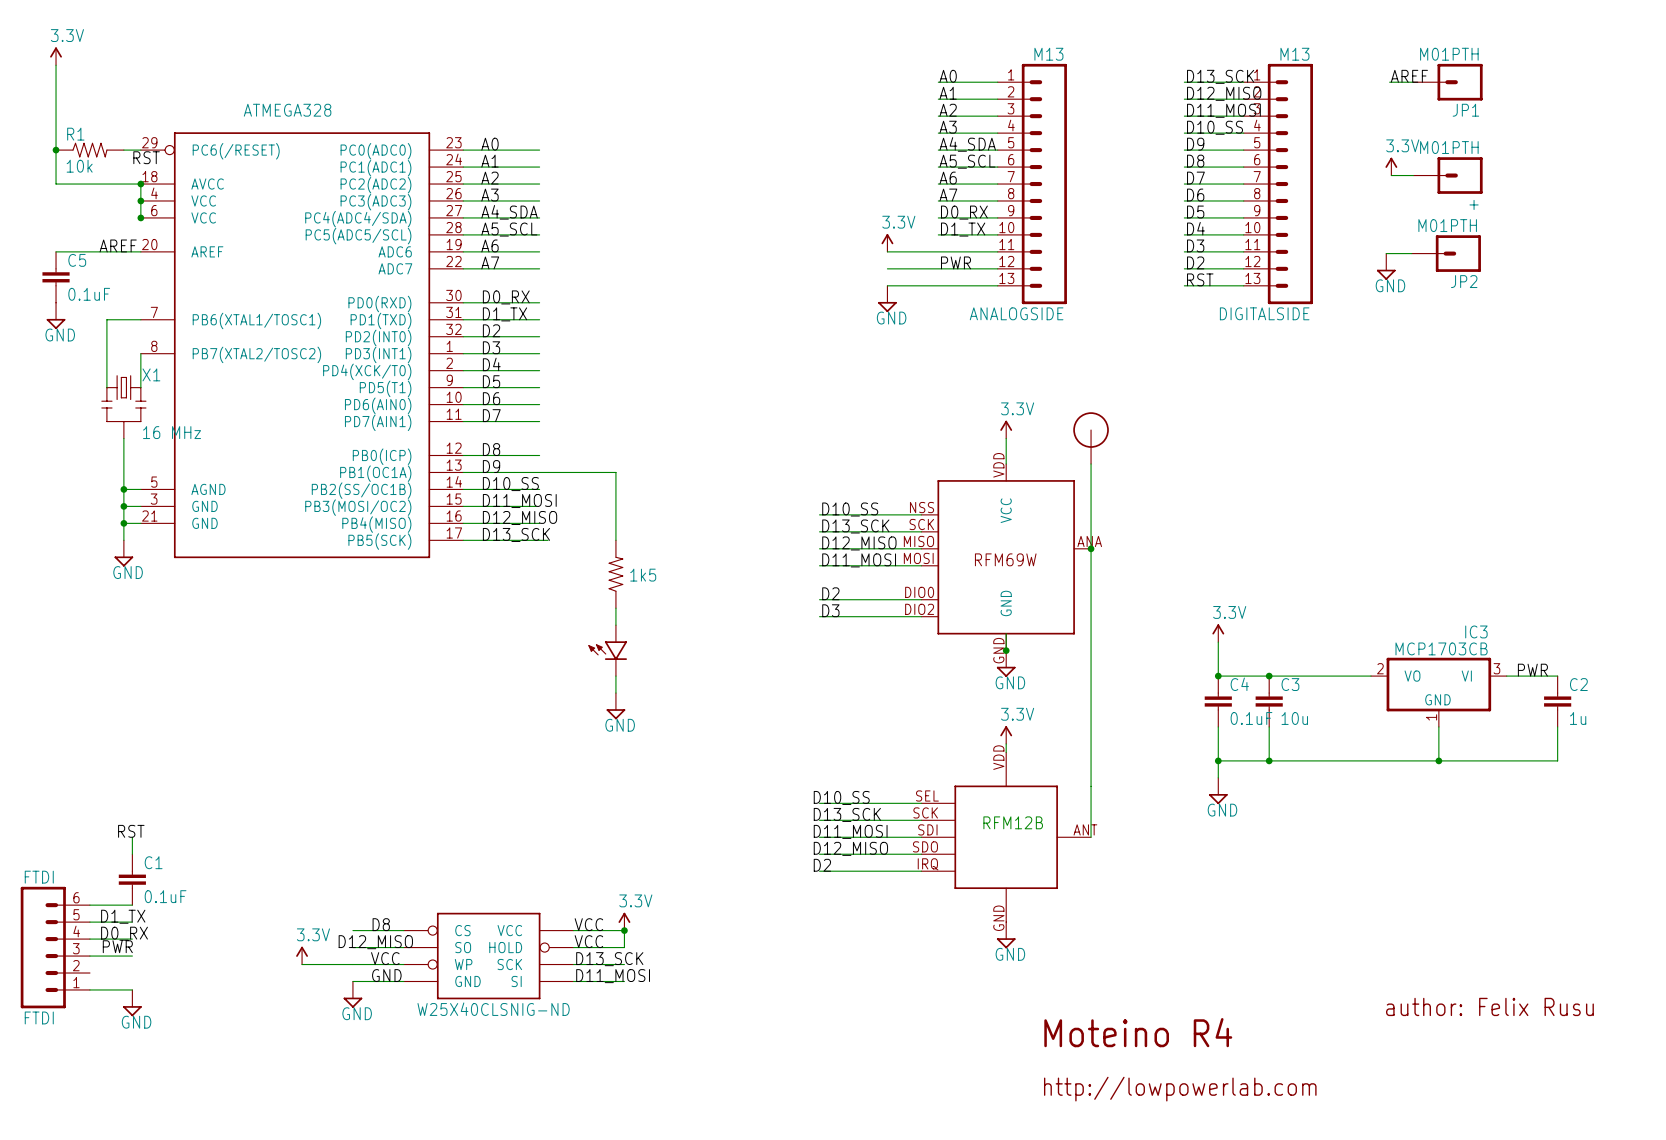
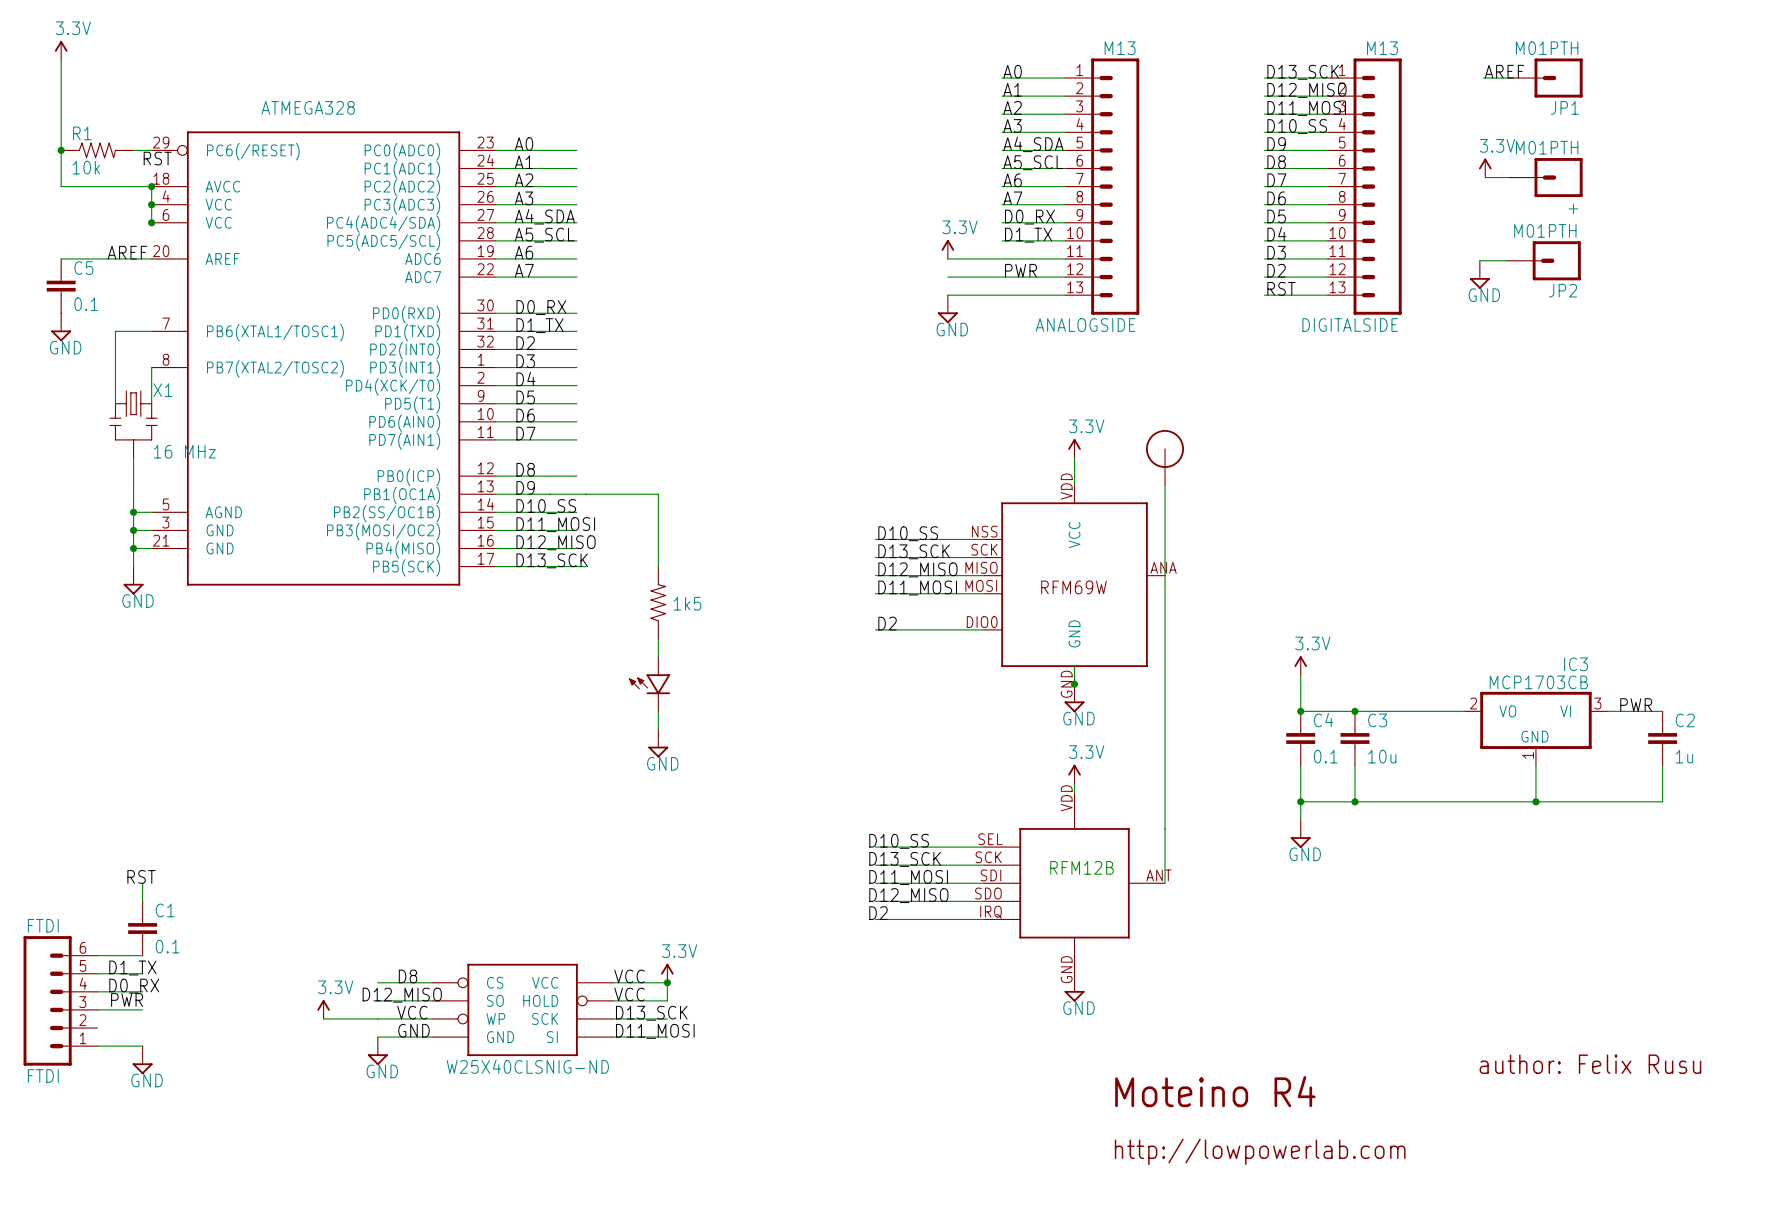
C5 value: 0.1uF (89, 294) -> 0.1 (86, 304)
part symbol: [921, 463, 1092, 651] -> [984, 485, 1166, 685]
junction: (1091, 548) -> none
label: D3 (830, 610) -> none
wire: (819, 616) (921, 616) -> none
C4 value: 0.1uF (1251, 718) -> 0.1 (1325, 756)
C1 value: 0.1uF (165, 896) -> 0.1 (167, 946)

